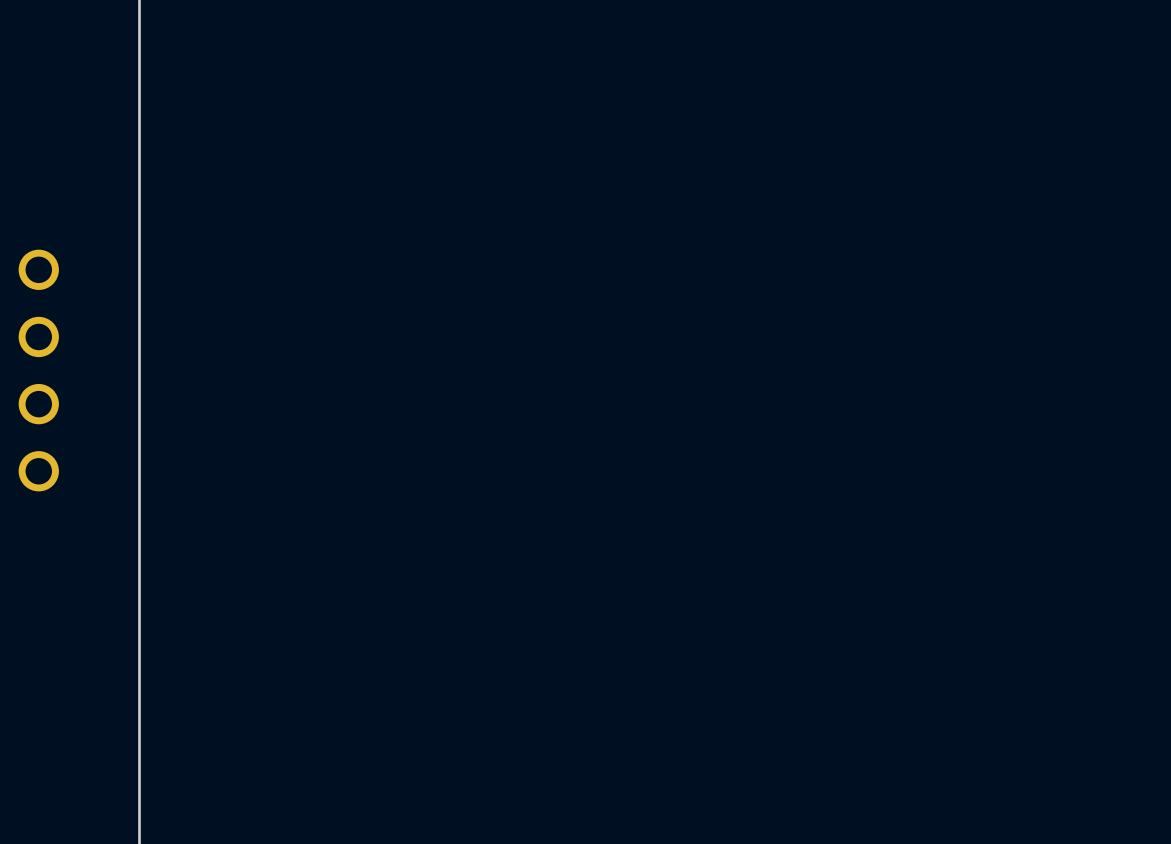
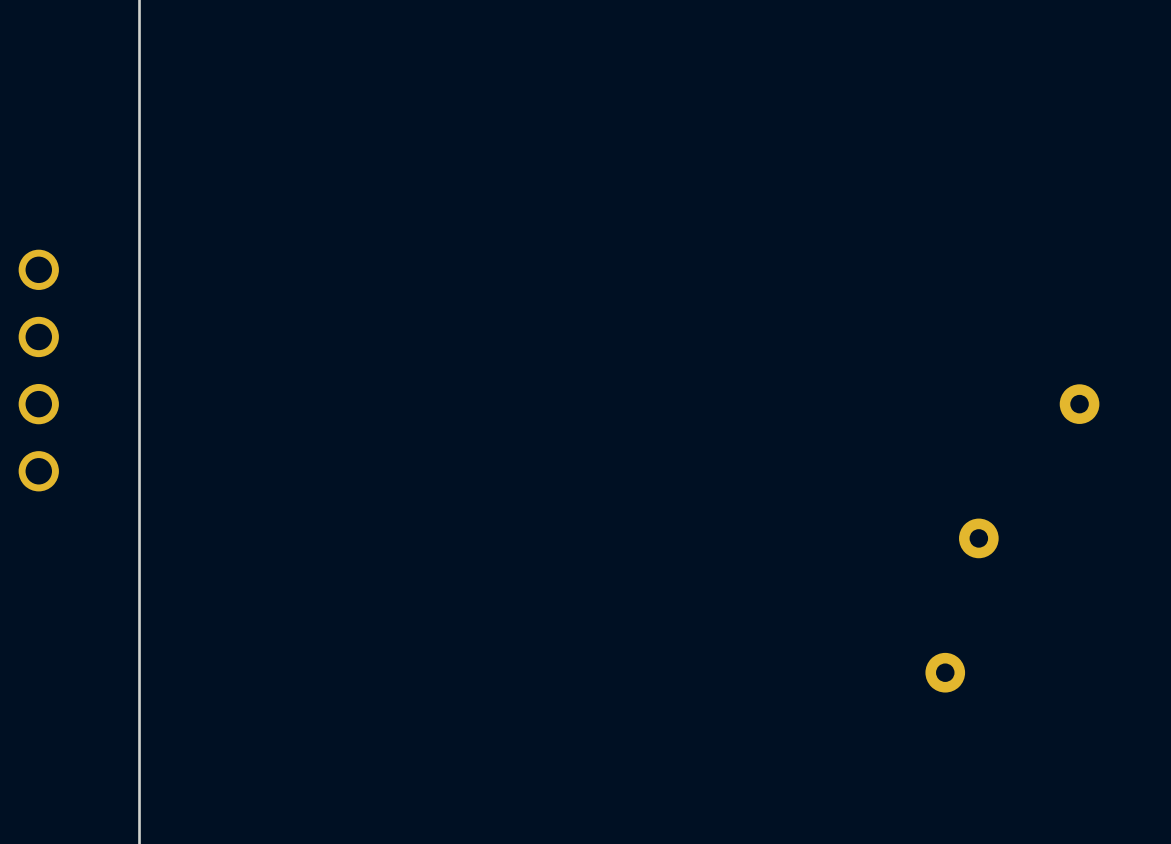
part: none -> (1079, 404)
part: none -> (978, 538)
part: none -> (945, 672)

